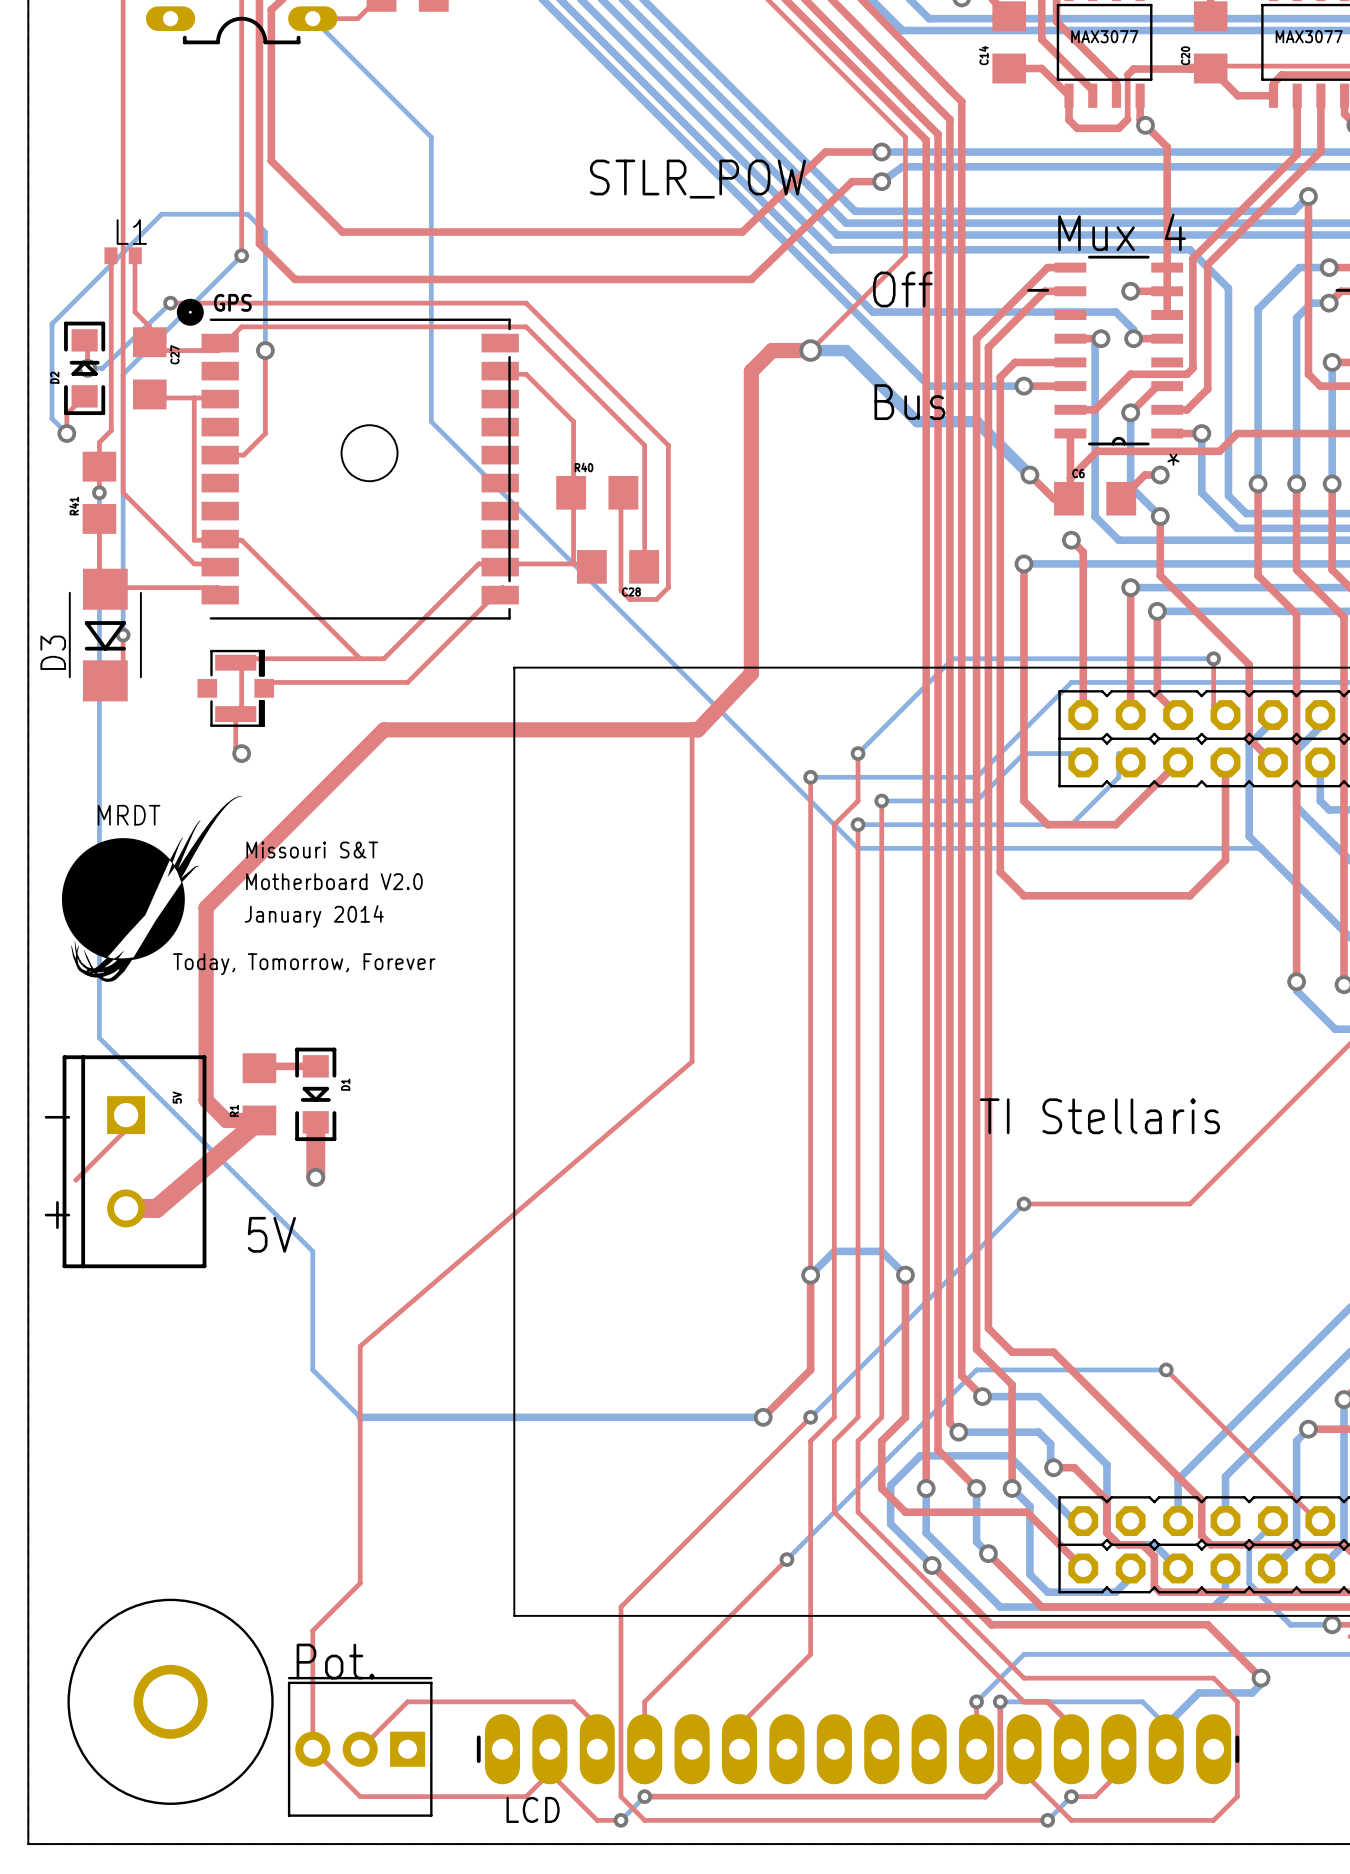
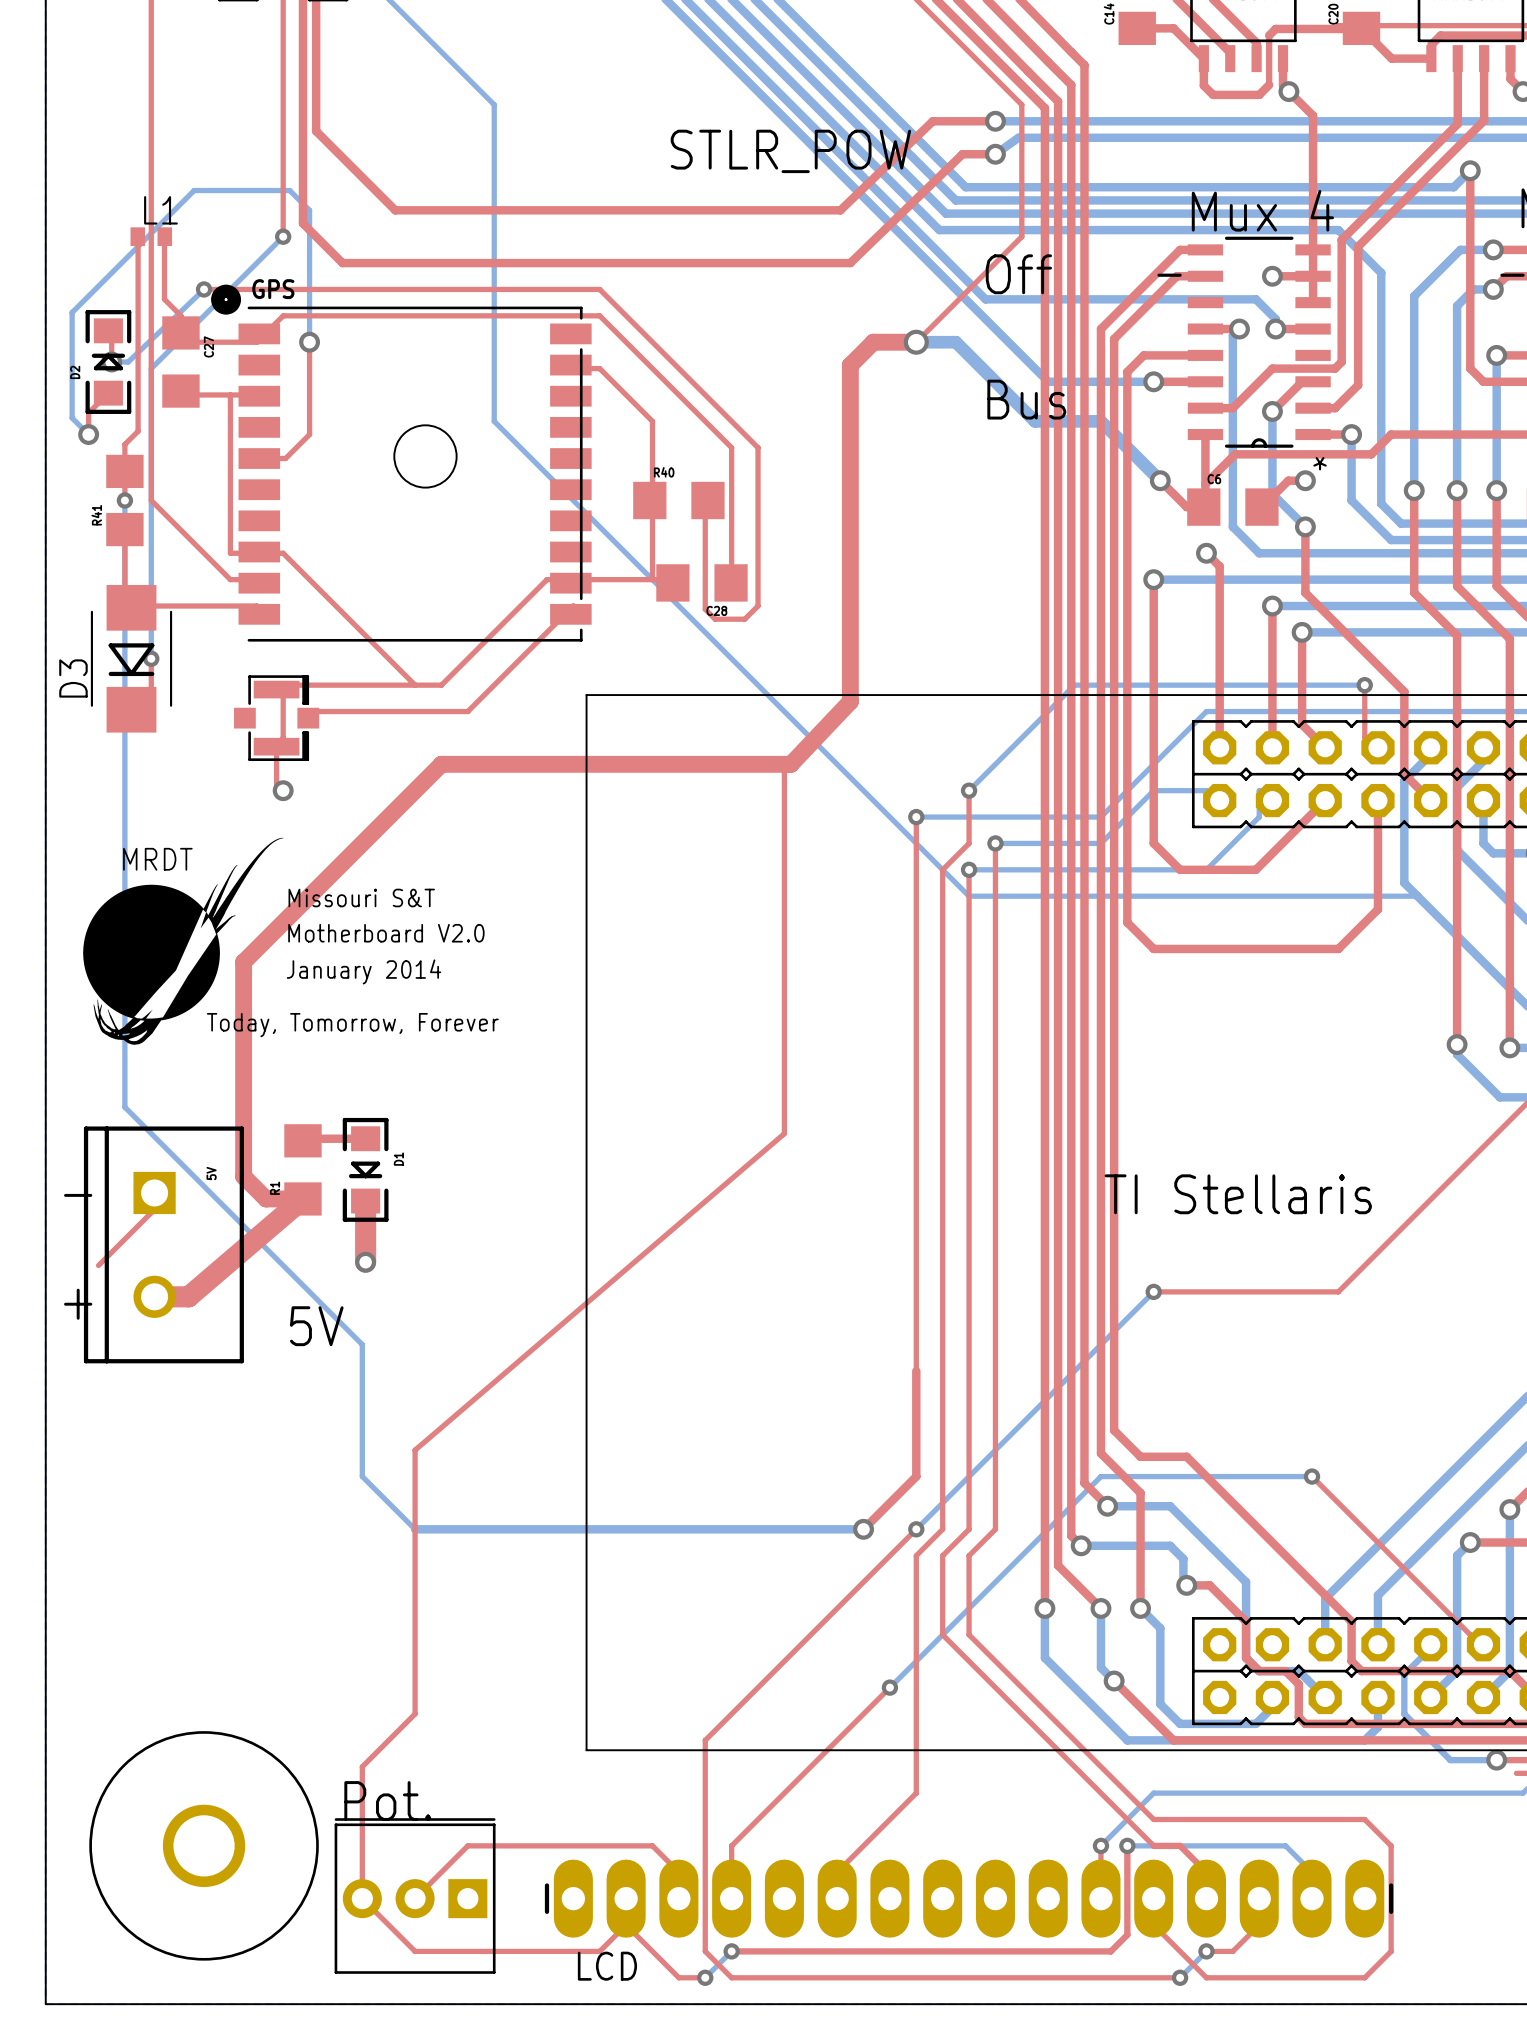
bottom track: (810, 1275) (834, 1251) (881, 1251) (905, 1275) -> none
via: (810, 1275) -> none
top track: (905, 1275) (905, 1417) (881, 1441) (881, 1488) (905, 1512) (1026, 1512) (1083, 1568) -> none
via: (905, 1275) -> none
bottom track: (1083, 1518) (1071, 1518) (1009, 1455) (920, 1455) (890, 1485) (890, 1524) (932, 1565) -> none
top track: (932, 1565) (991, 1624) (1207, 1624) (1261, 1678) -> none
via: (932, 1565) -> none
bottom track: (1261, 1678) (1261, 1684) (1252, 1692) (1198, 1692) (1166, 1725) -> none
via: (1261, 1678) -> none

